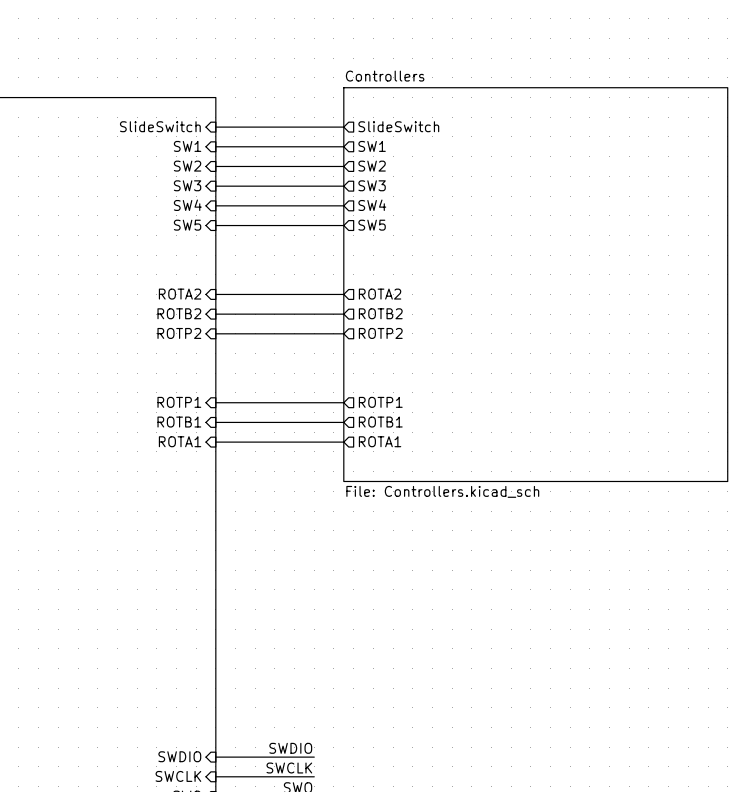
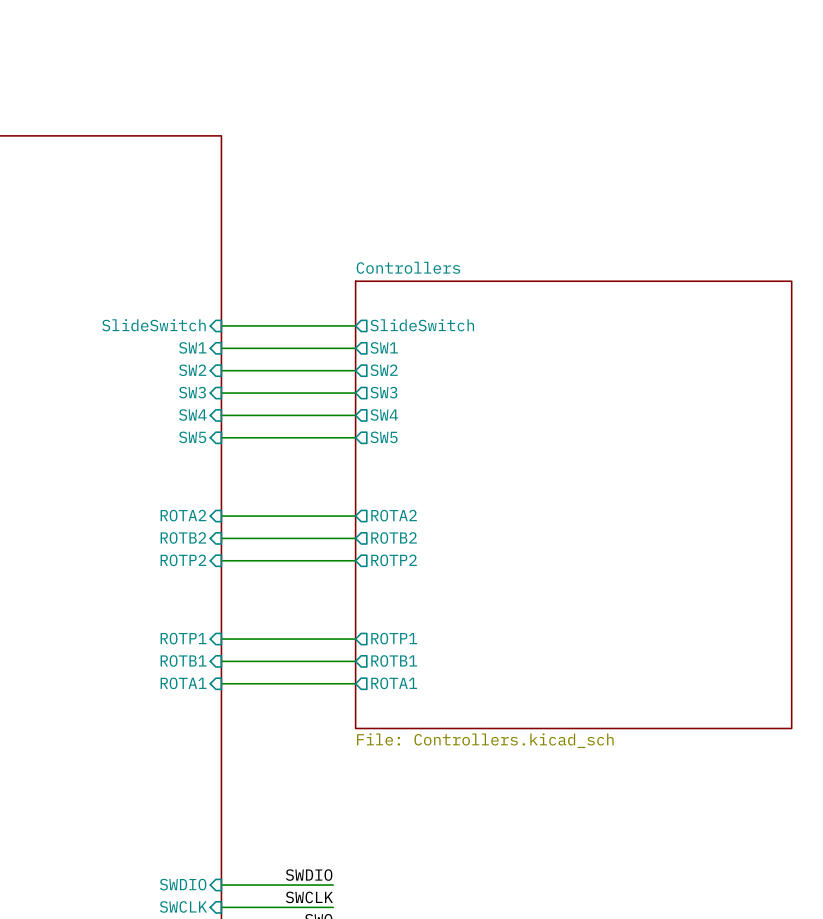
sheet pin: SlideSwitch (160, 126) -> none
sheet pin: SlideSwitch (398, 126) -> none
wire: (215, 127) (343, 127) -> none
sheet pin: SW1 (187, 146) -> none
wire: (215, 146) (343, 146) -> none
sheet pin: SW1 (372, 146) -> none
sheet pin: SW2 (187, 166) -> none
wire: (215, 166) (343, 166) -> none
sheet pin: SW2 (372, 166) -> none
sheet pin: SW3 (187, 185) -> none
sheet pin: SW3 (372, 185) -> none
wire: (215, 186) (343, 186) -> none
sheet pin: SW4 (187, 205) -> none
wire: (215, 205) (343, 205) -> none
sheet pin: SW4 (372, 205) -> none
sheet pin: SW5 (187, 225) -> none
wire: (215, 225) (343, 225) -> none
sheet pin: SW5 (372, 225) -> none
sheet pin: none -> SlideSwitch (154, 325)
wire: none -> (221, 325) (355, 325)
sheet pin: none -> SlideSwitch (422, 325)
sheet pin: none -> SW1 (192, 347)
wire: none -> (221, 348) (355, 348)
sheet pin: none -> SW1 (384, 347)
sheet Controllers position: (535, 284) -> (573, 504)
sheet pin: ROTA2 (180, 294) -> none
wire: (215, 294) (343, 294) -> none
sheet pin: ROTA2 (380, 294) -> none
sheet pin: none -> SW2 (192, 370)
sheet pin: none -> SW2 (384, 370)
wire: none -> (221, 370) (355, 370)
sheet pin: ROTB2 (179, 313) -> none
sheet pin: ROTB2 (380, 313) -> none
wire: (215, 314) (343, 314) -> none
sheet pin: none -> SW3 (192, 392)
wire: none -> (221, 393) (355, 393)
sheet pin: none -> SW3 (383, 392)
sheet pin: ROTP2 (179, 333) -> none
wire: (215, 333) (343, 333) -> none
sheet pin: ROTP2 (380, 333) -> none
sheet pin: none -> SW4 (192, 414)
wire: none -> (221, 415) (355, 415)
sheet pin: none -> SW4 (384, 414)
sheet pin: none -> SW5 (192, 437)
sheet pin: none -> SW5 (384, 437)
wire: none -> (221, 437) (355, 437)
sheet pin: ROTP1 (179, 402) -> none
wire: (215, 402) (343, 402) -> none
sheet pin: ROTP1 (380, 402) -> none
sheet pin: ROTB1 (179, 422) -> none
wire: (215, 422) (343, 422) -> none
sheet pin: ROTB1 (380, 422) -> none
wire: none -> (221, 516) (355, 516)
sheet pin: ROTA1 (180, 441) -> ROTA2 (183, 515)
sheet pin: ROTA1 (380, 441) -> ROTA2 (394, 515)
wire: (215, 442) (343, 442) -> none
sheet pin: none -> ROTB2 (183, 537)
wire: none -> (221, 538) (355, 538)
sheet pin: none -> ROTB2 (394, 537)
sheet pin: none -> ROTP2 (183, 560)
wire: none -> (221, 560) (355, 560)
sheet pin: none -> ROTP2 (394, 560)
sheet pin: none -> ROTP1 (183, 638)
wire: none -> (221, 639) (355, 639)
sheet pin: none -> ROTP1 (394, 638)
sheet pin: none -> ROTB1 (183, 660)
sheet pin: none -> ROTB1 (394, 660)
wire: none -> (221, 661) (355, 661)
sheet pin: none -> ROTA1 (183, 683)
wire: none -> (221, 683) (355, 683)
sheet pin: none -> ROTA1 (394, 683)

